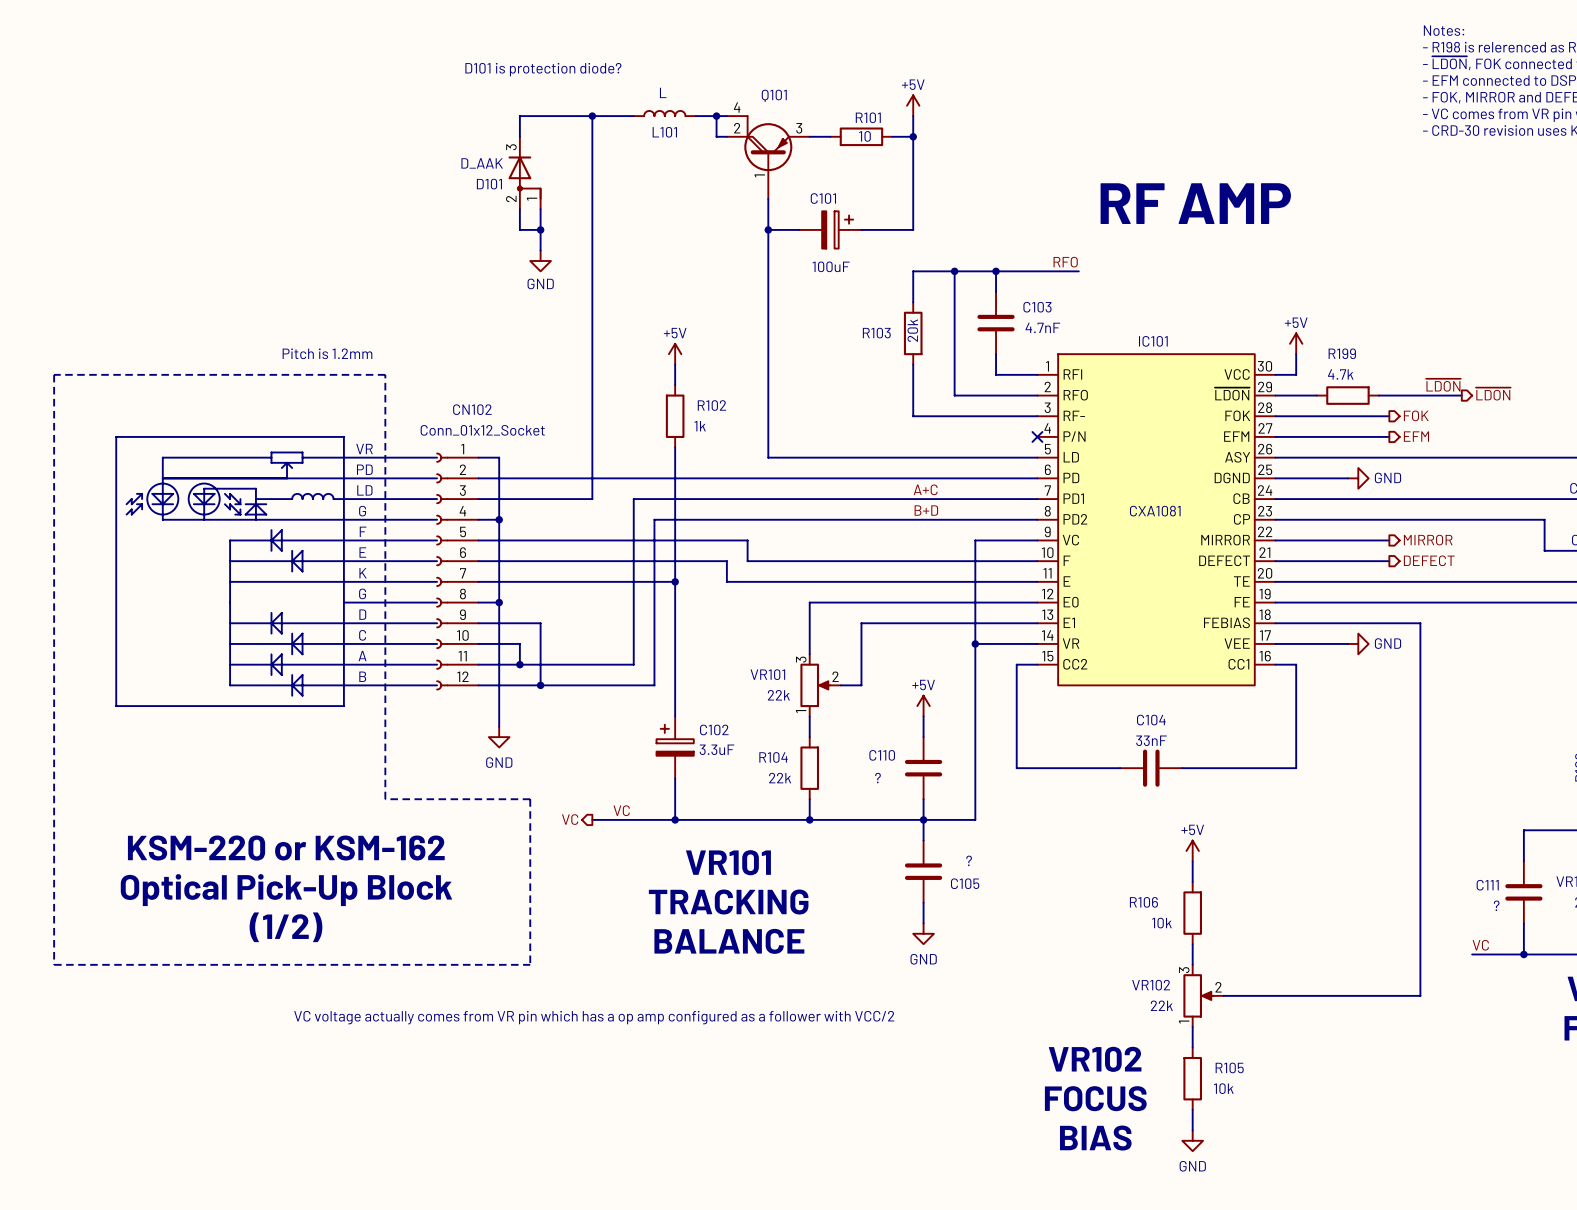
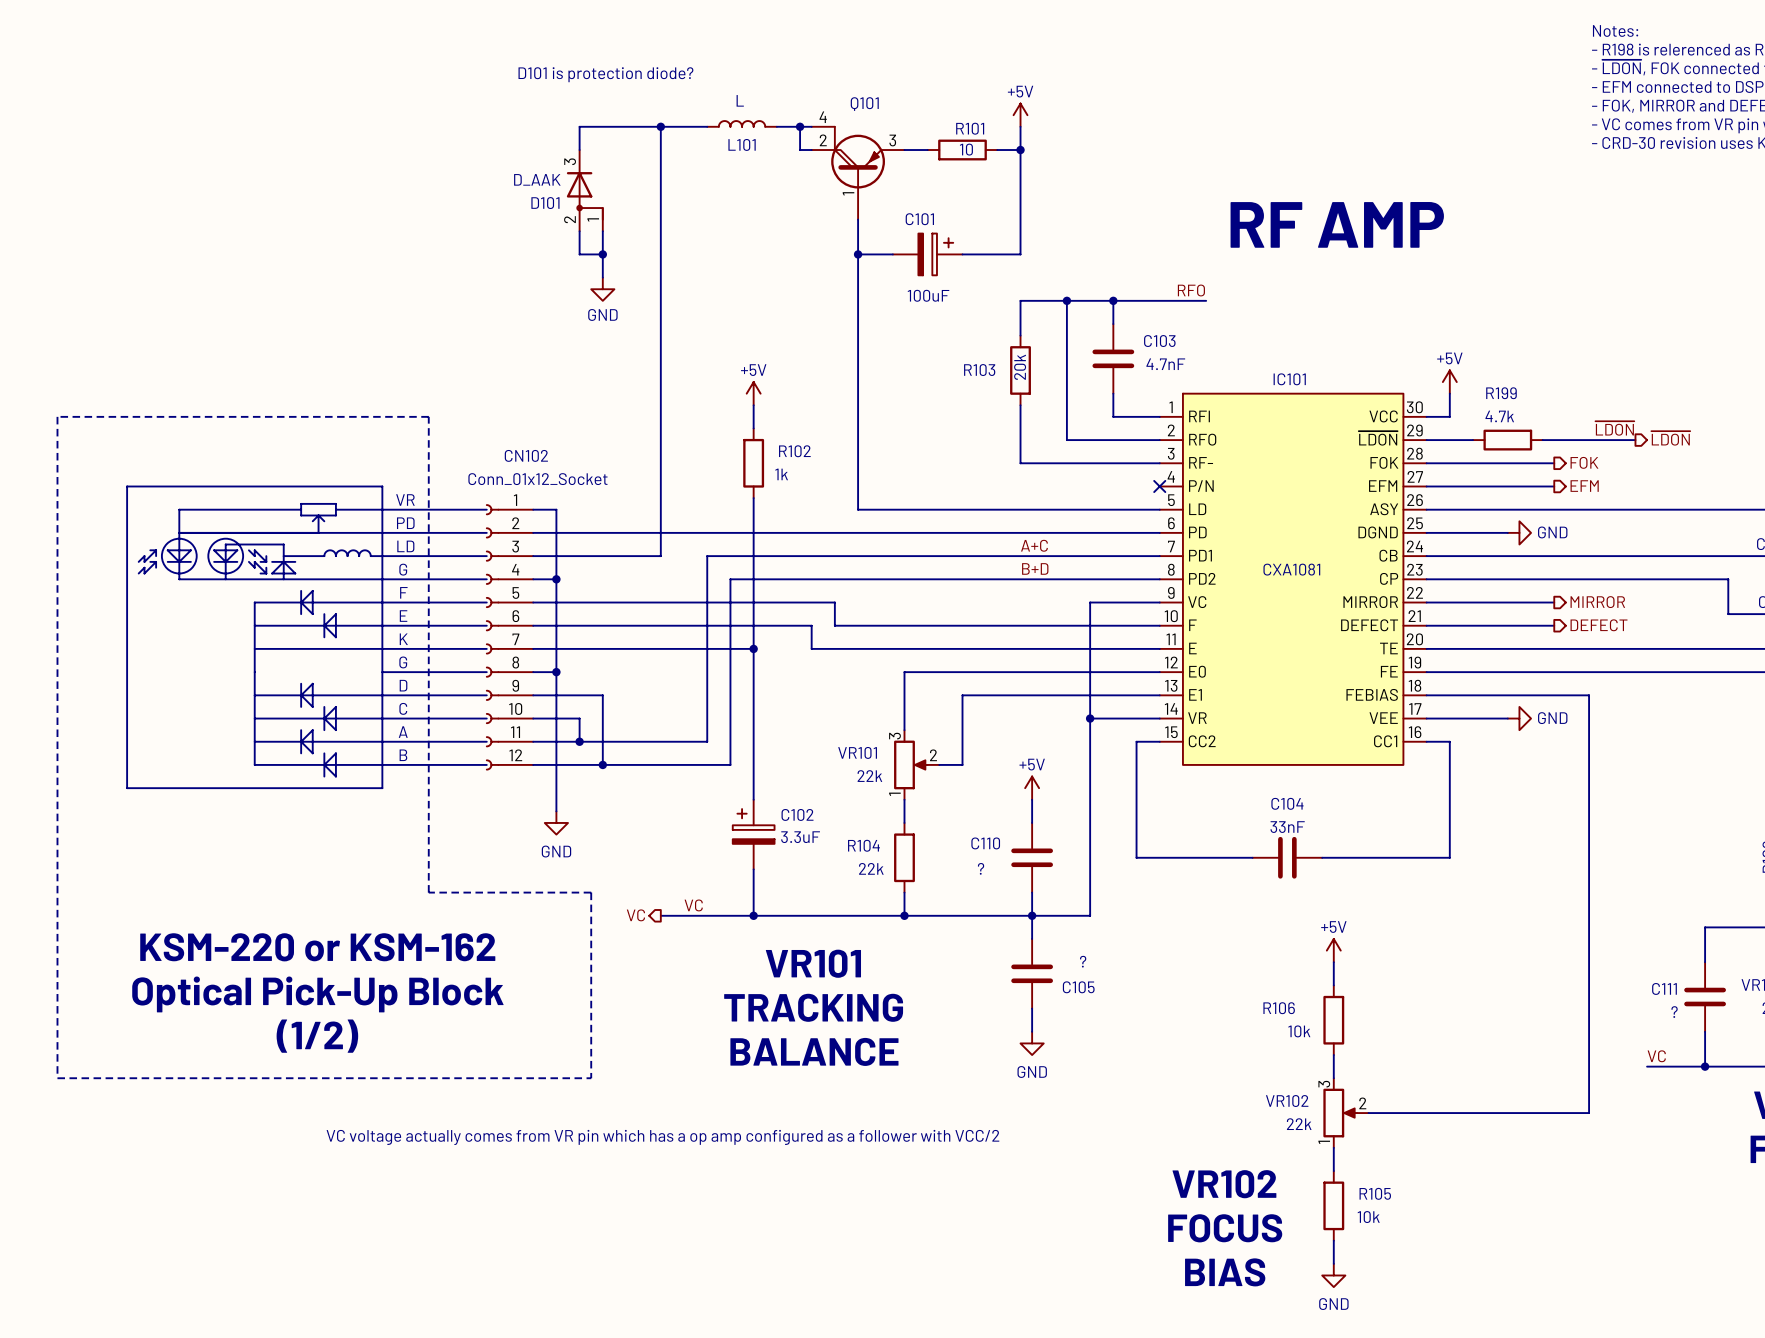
text: Pitch is 1.2mm (327, 353) -> none

